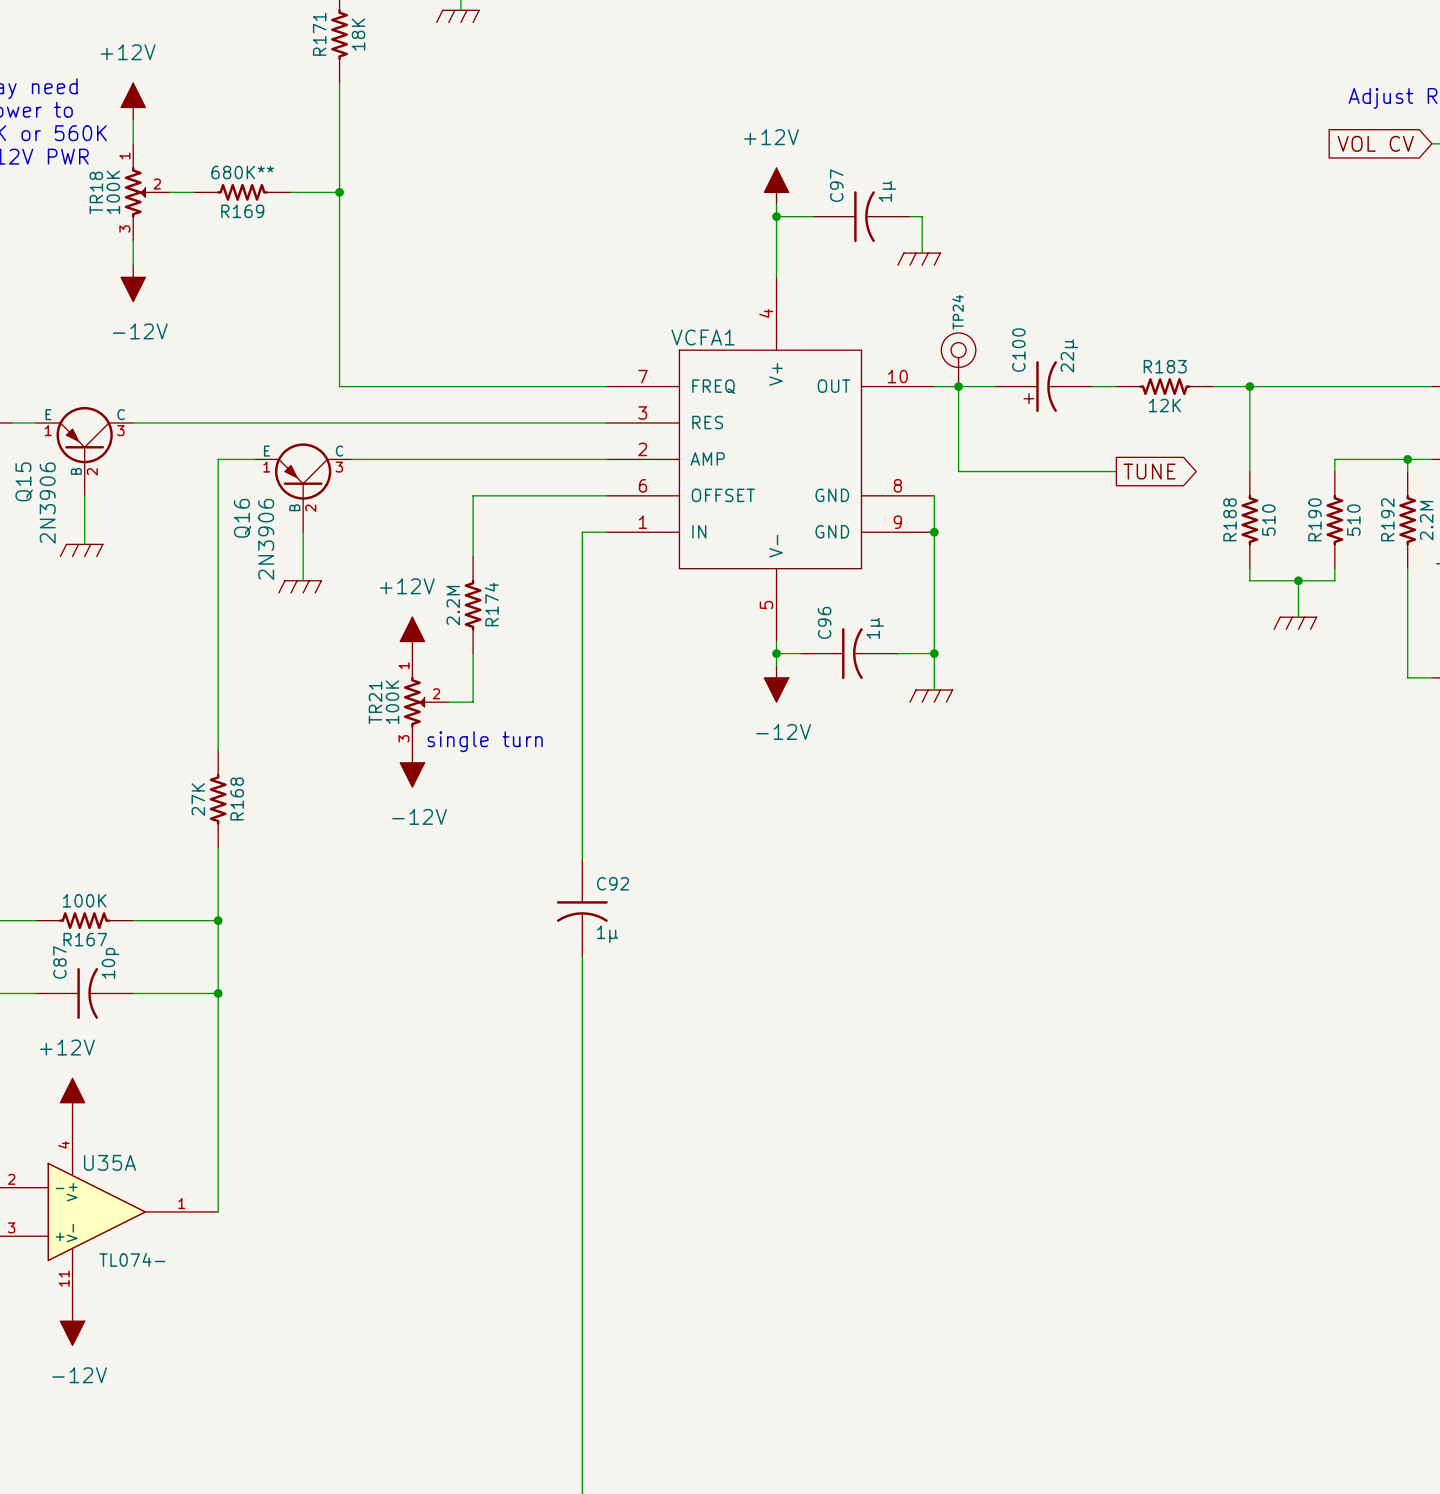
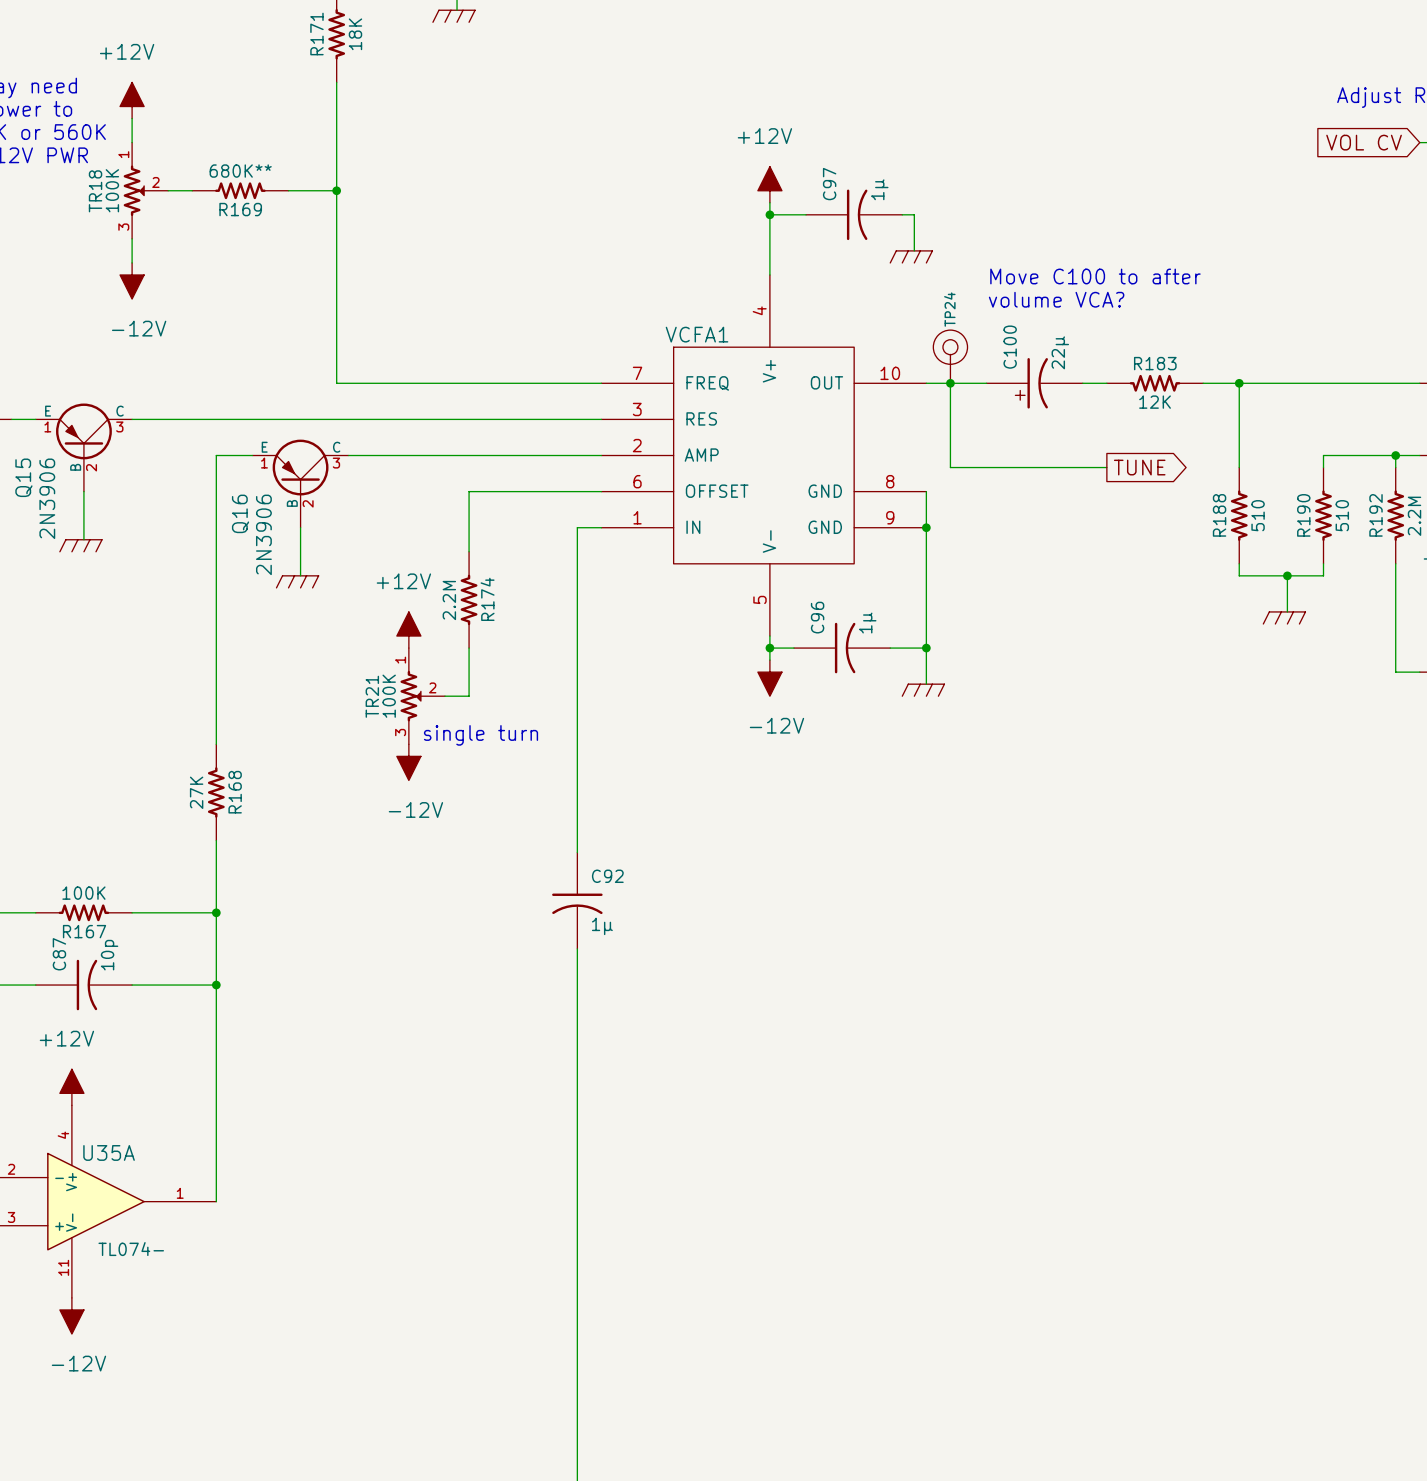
text: none -> Move C100 to after (1095, 276)
text: none -> volume VCA? (1056, 299)

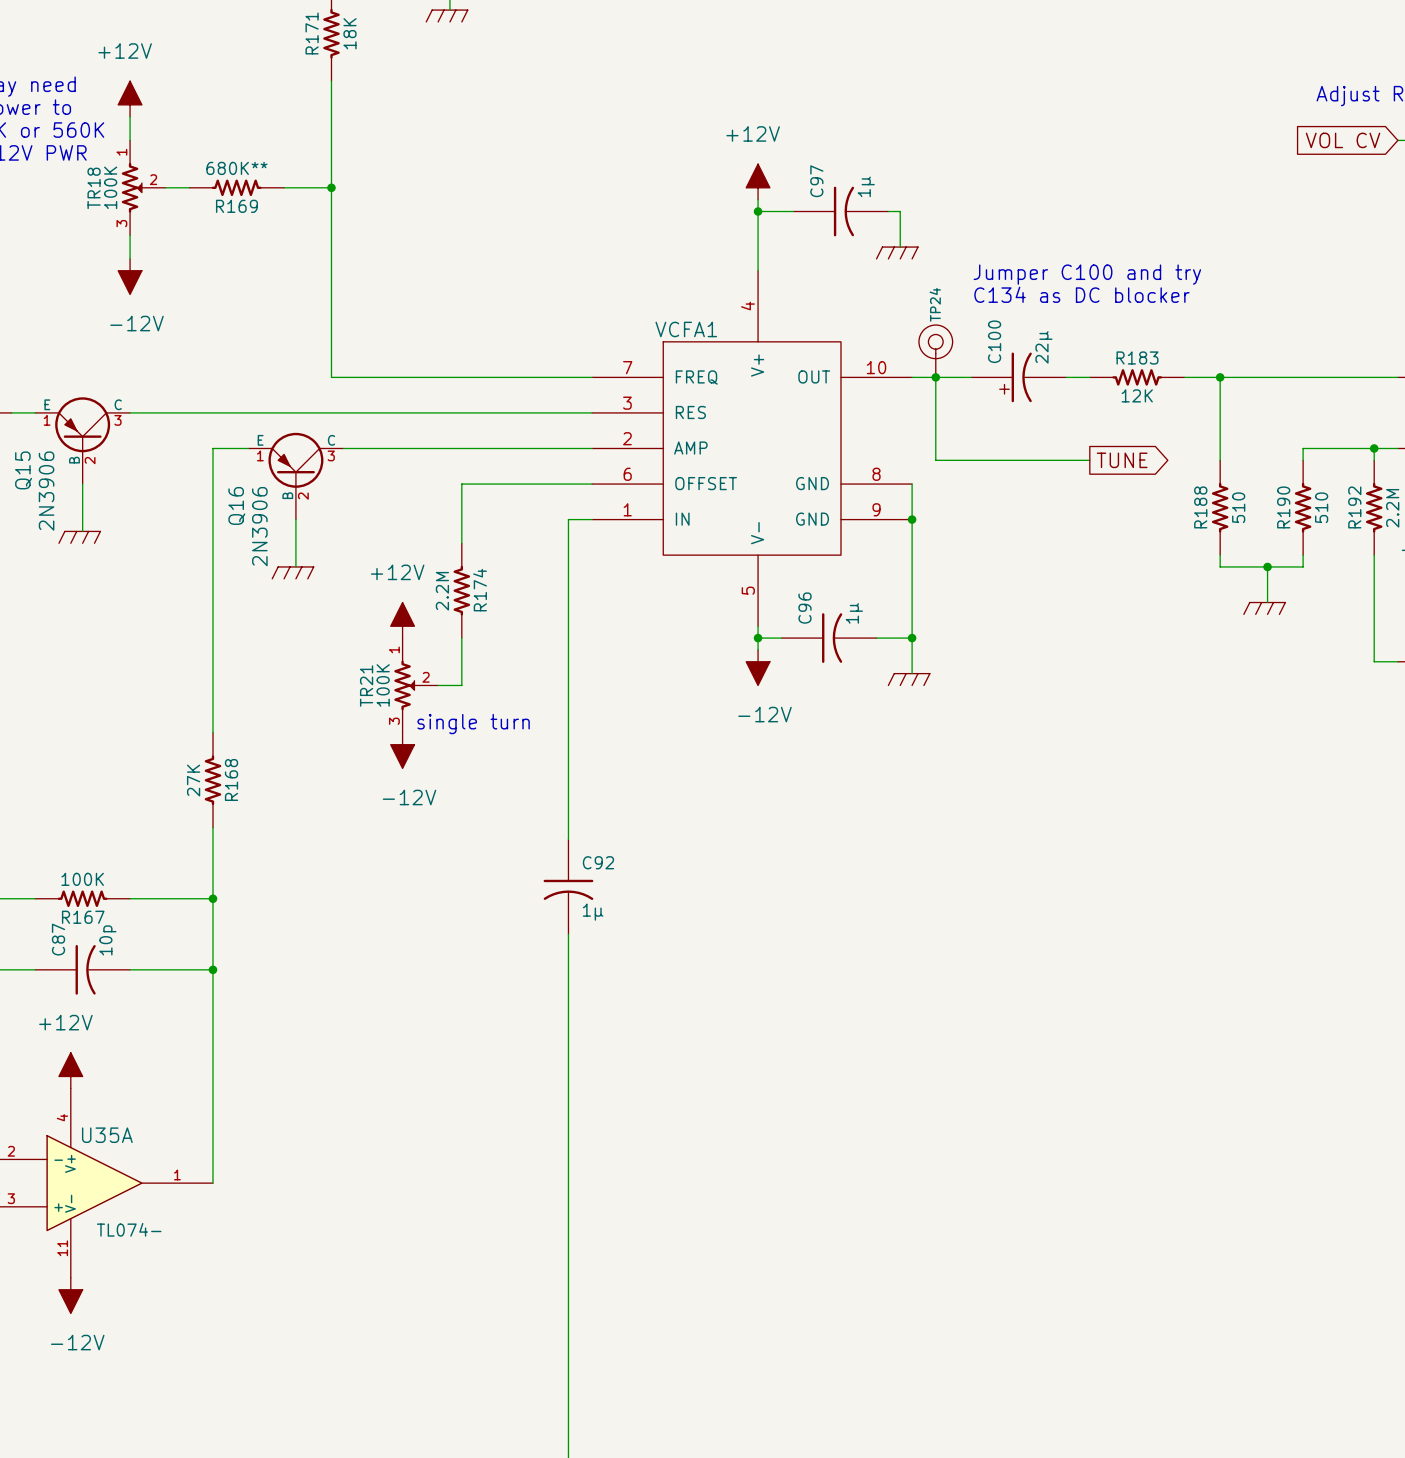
text: Move C100 to after (1095, 276) -> Jumper C100 and try (1087, 274)
text: volume VCA? (1056, 299) -> C134 as DC blocker (1081, 294)

